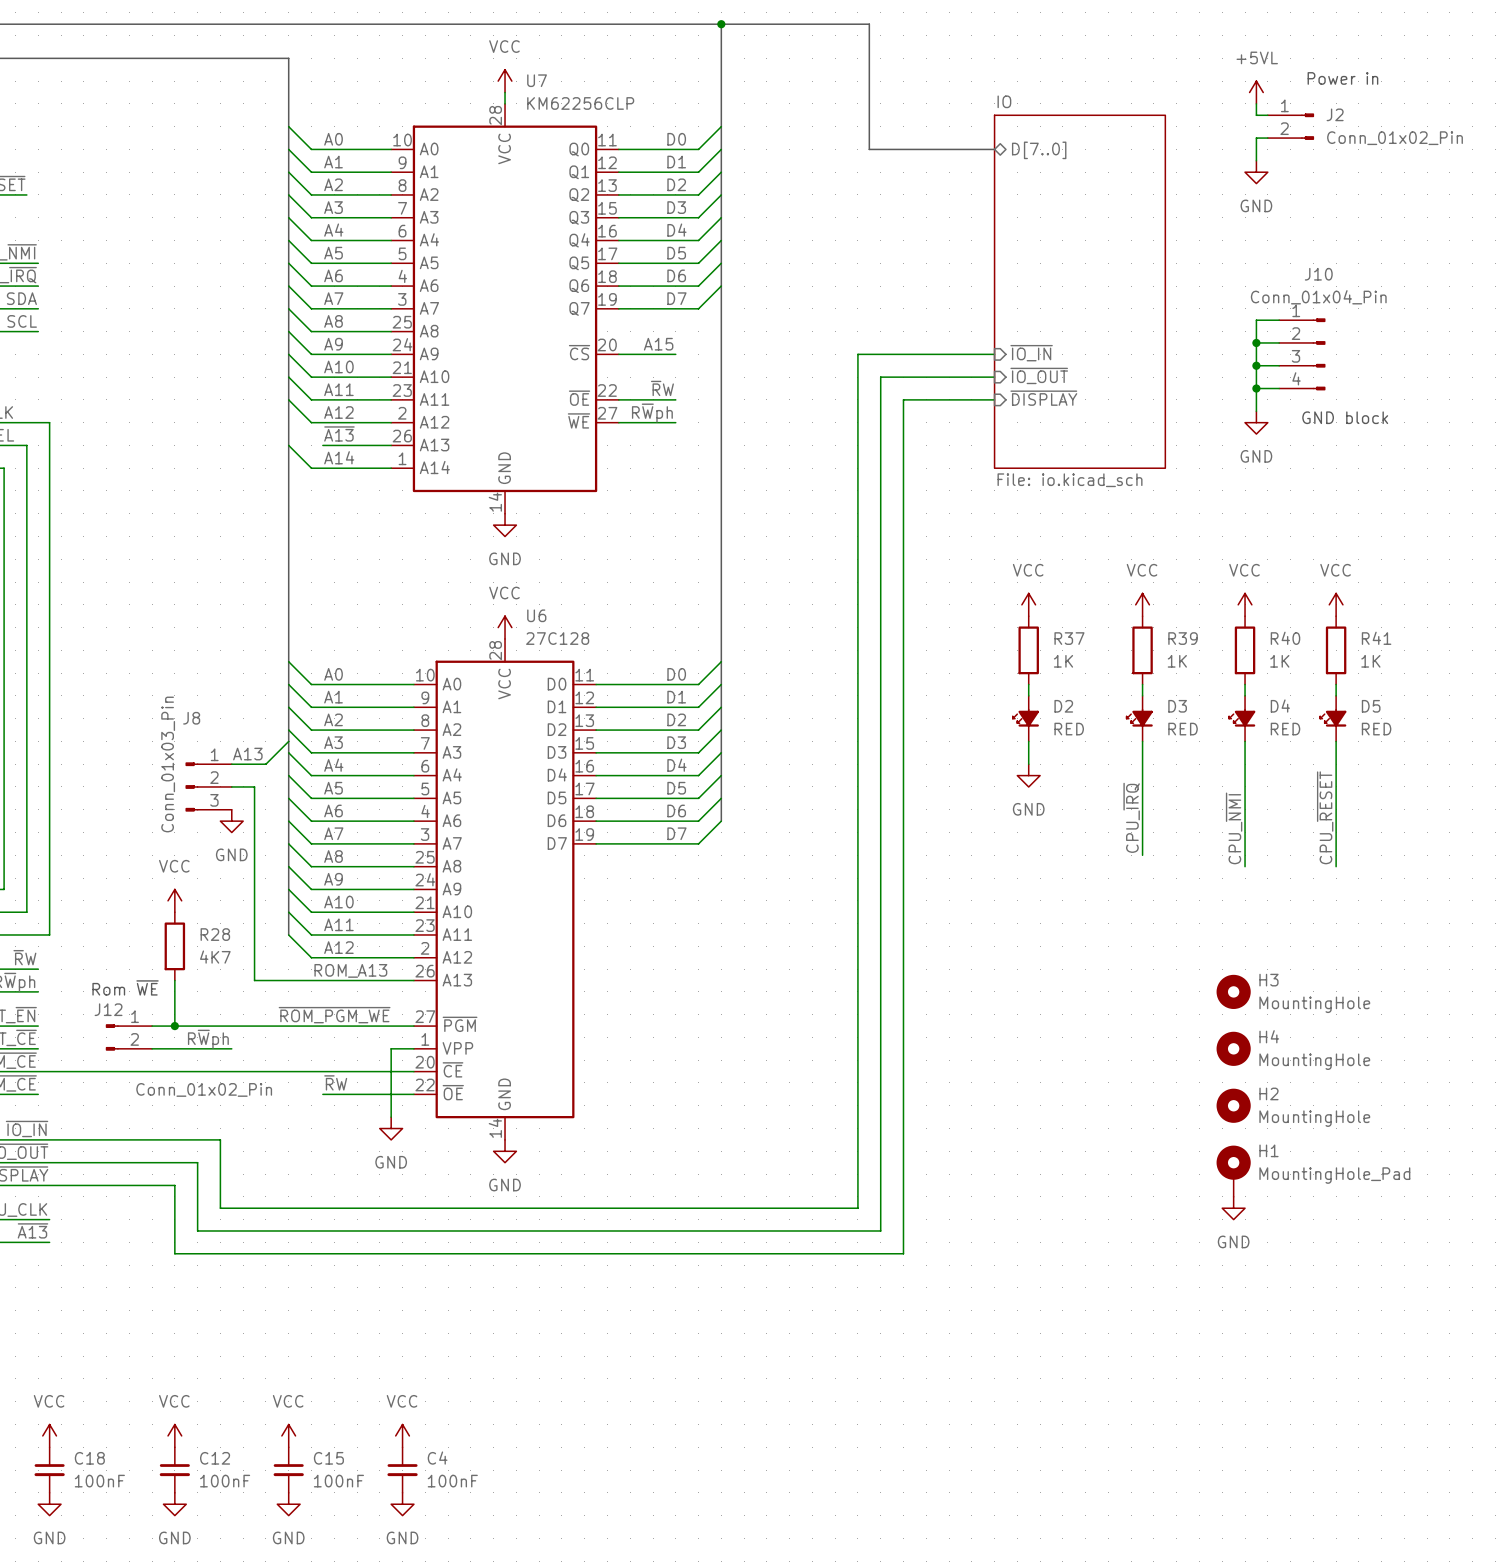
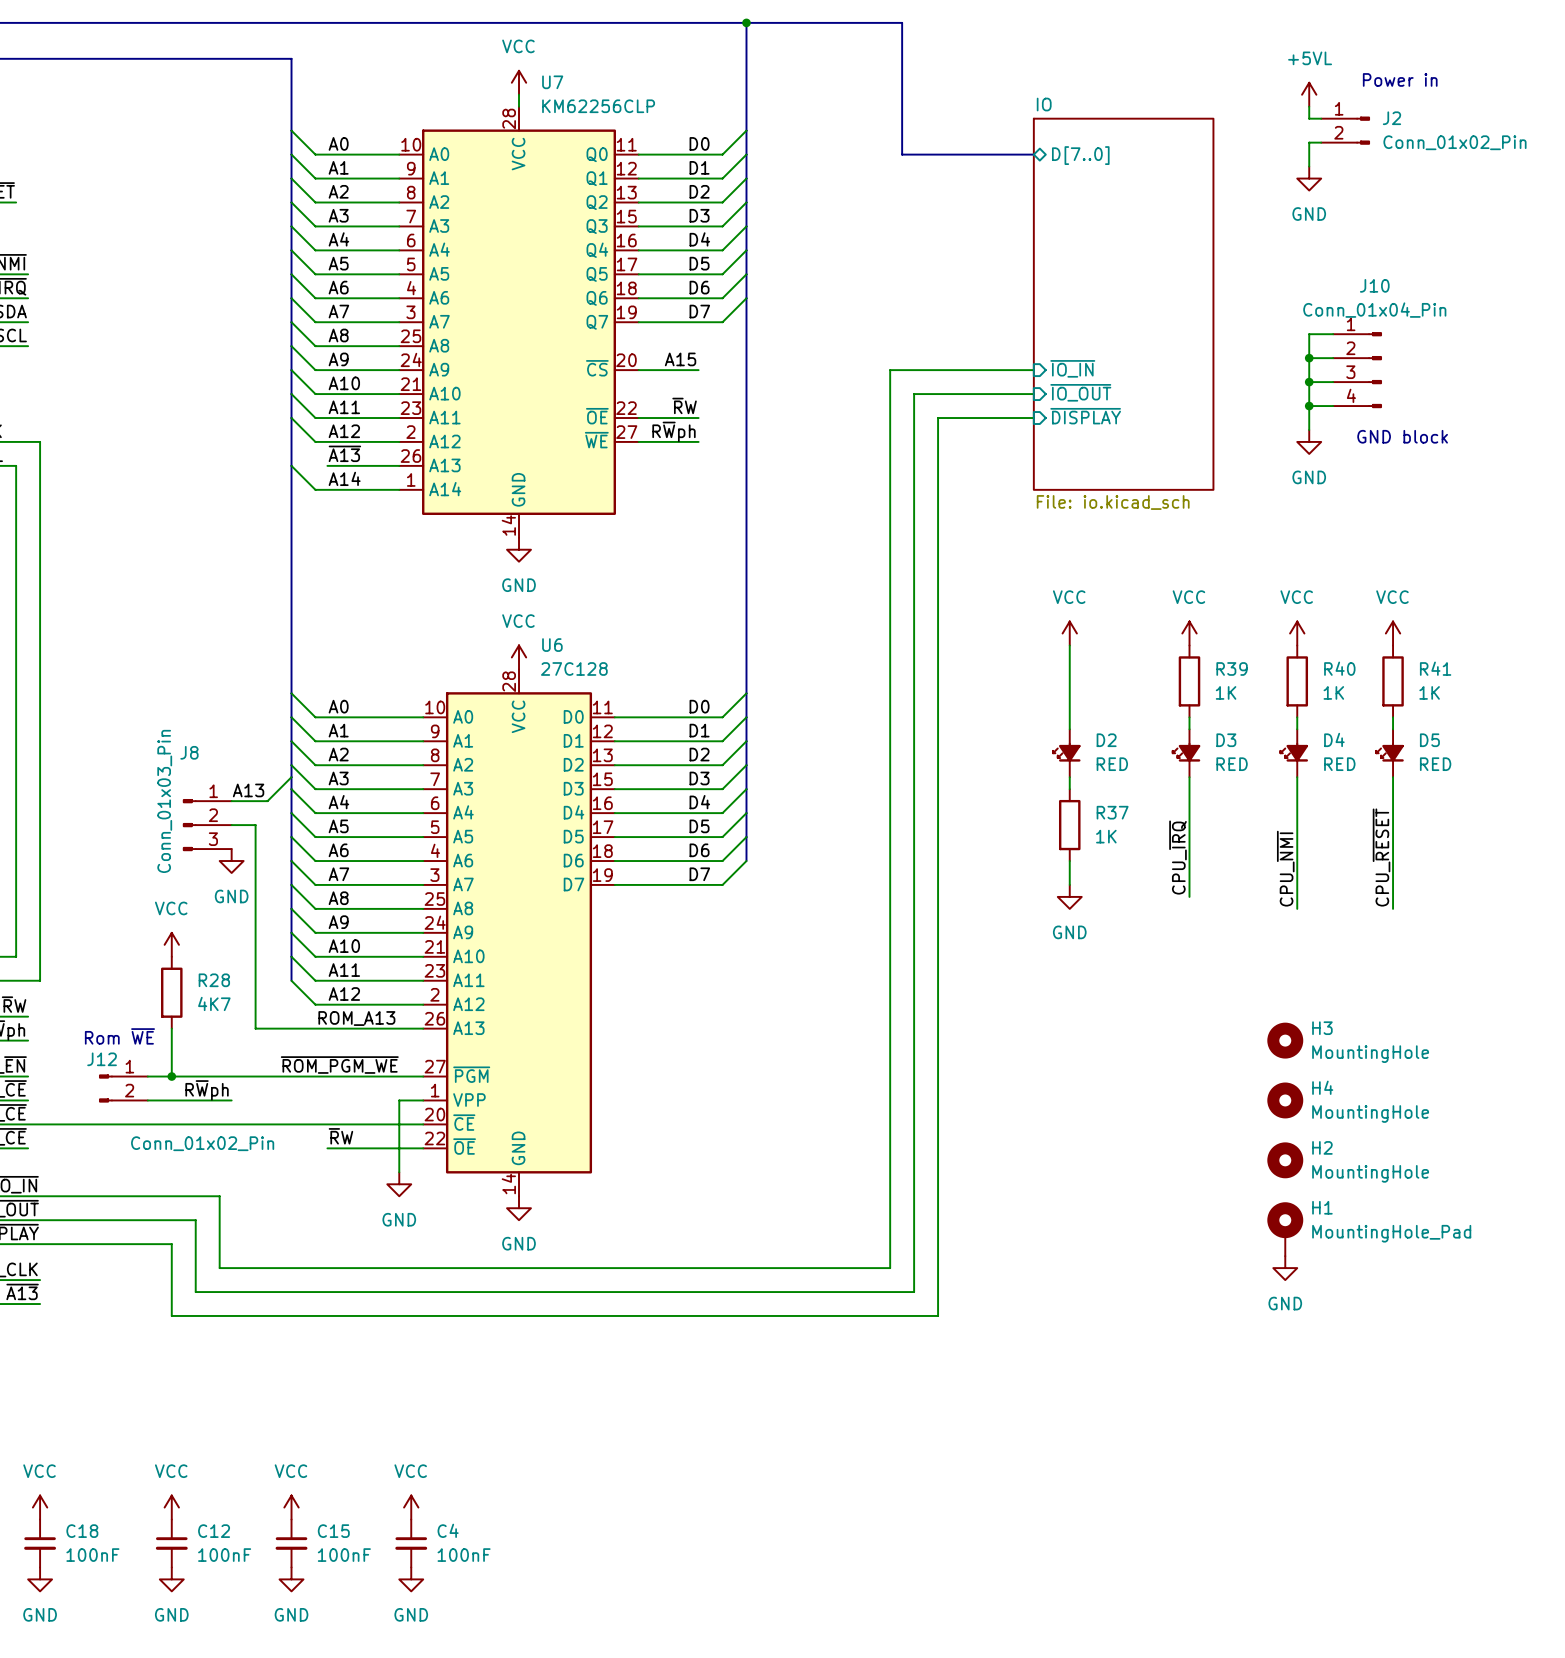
wire: none -> (1069, 645) (1069, 717)
R37 position: (1028, 650) -> (1069, 825)
power symbol position: GND (1028, 775) -> GND (1069, 896)
wire: none -> (1069, 861) (1069, 884)

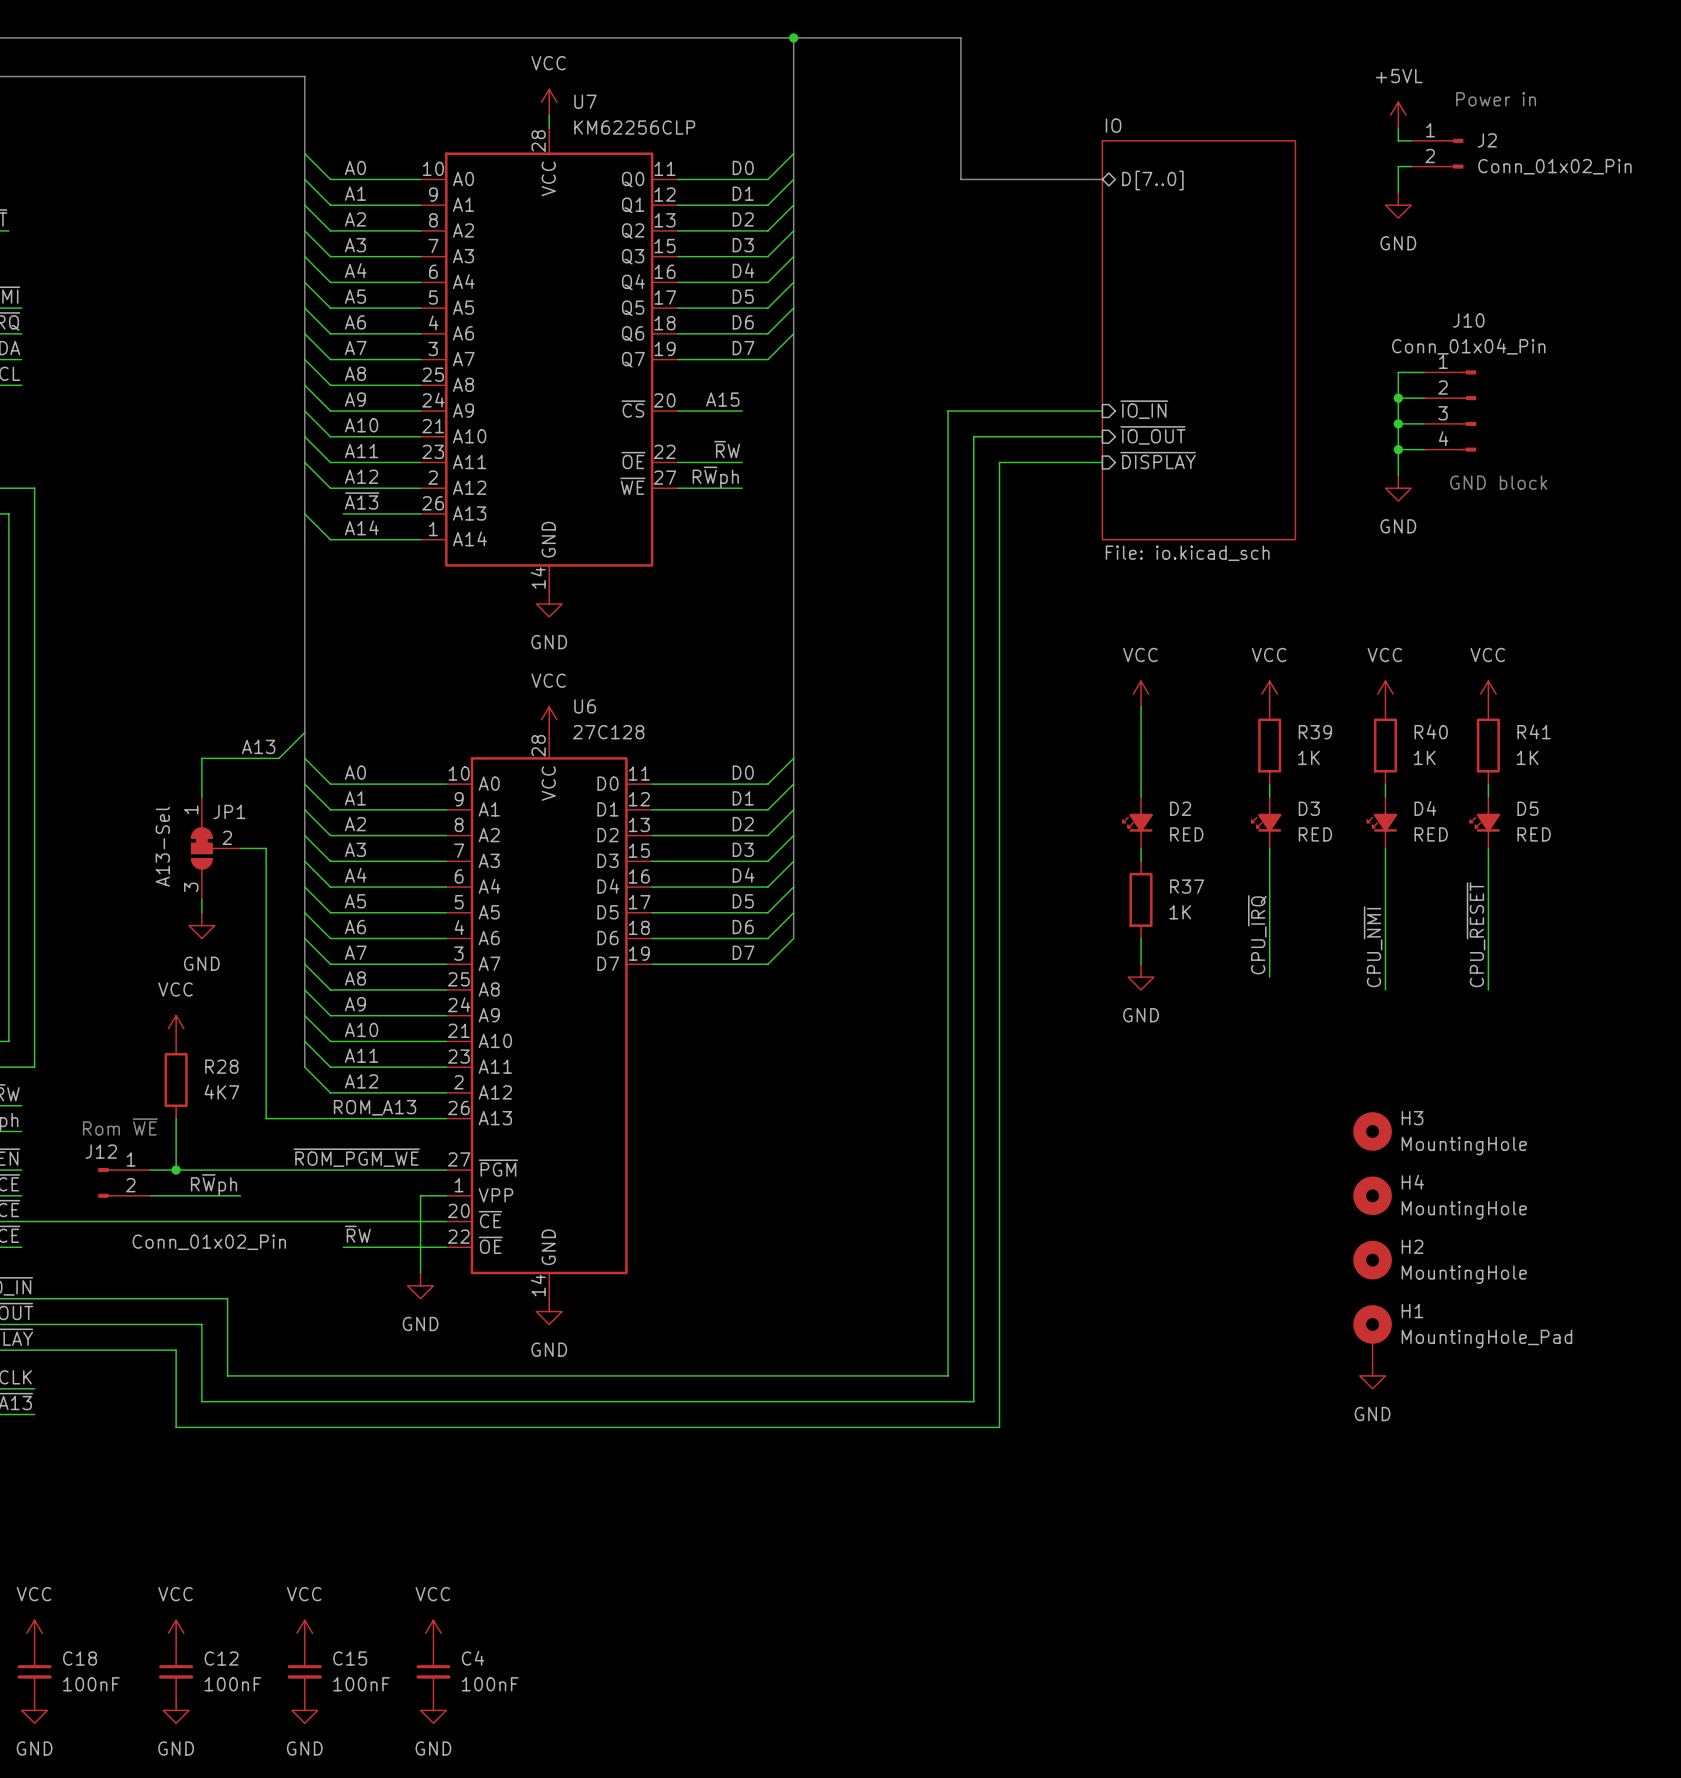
wire: none -> (304, 732) (279, 758) (201, 758) (201, 796)
JP1: none -> A13-Sel (216, 848)
wire: (291, 777) (267, 801) (231, 801) -> none
label position: A13 (248, 790) -> A13 (258, 746)
wire: none -> (201, 899) (201, 912)
J8: Conn_01x03_Pin (207, 825) -> none
wire: (231, 825) (255, 825) -> (240, 848) (266, 848) (266, 899)
power symbol position: GND (231, 861) -> GND (201, 925)

